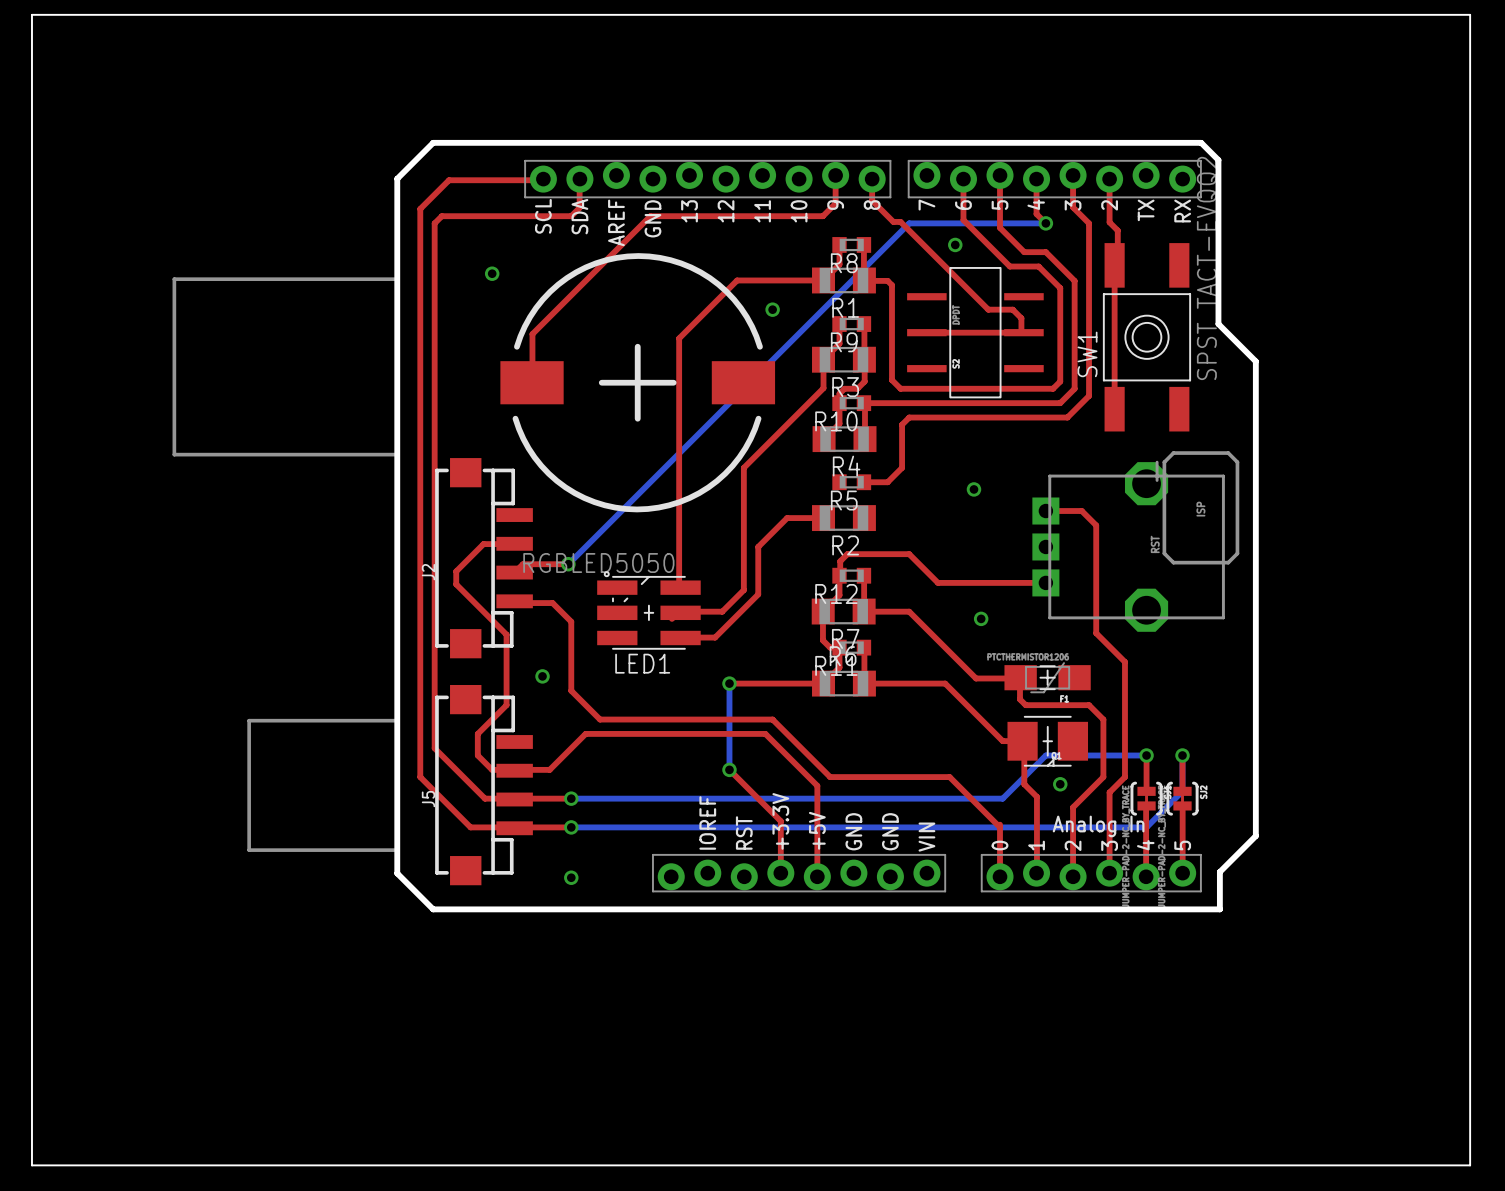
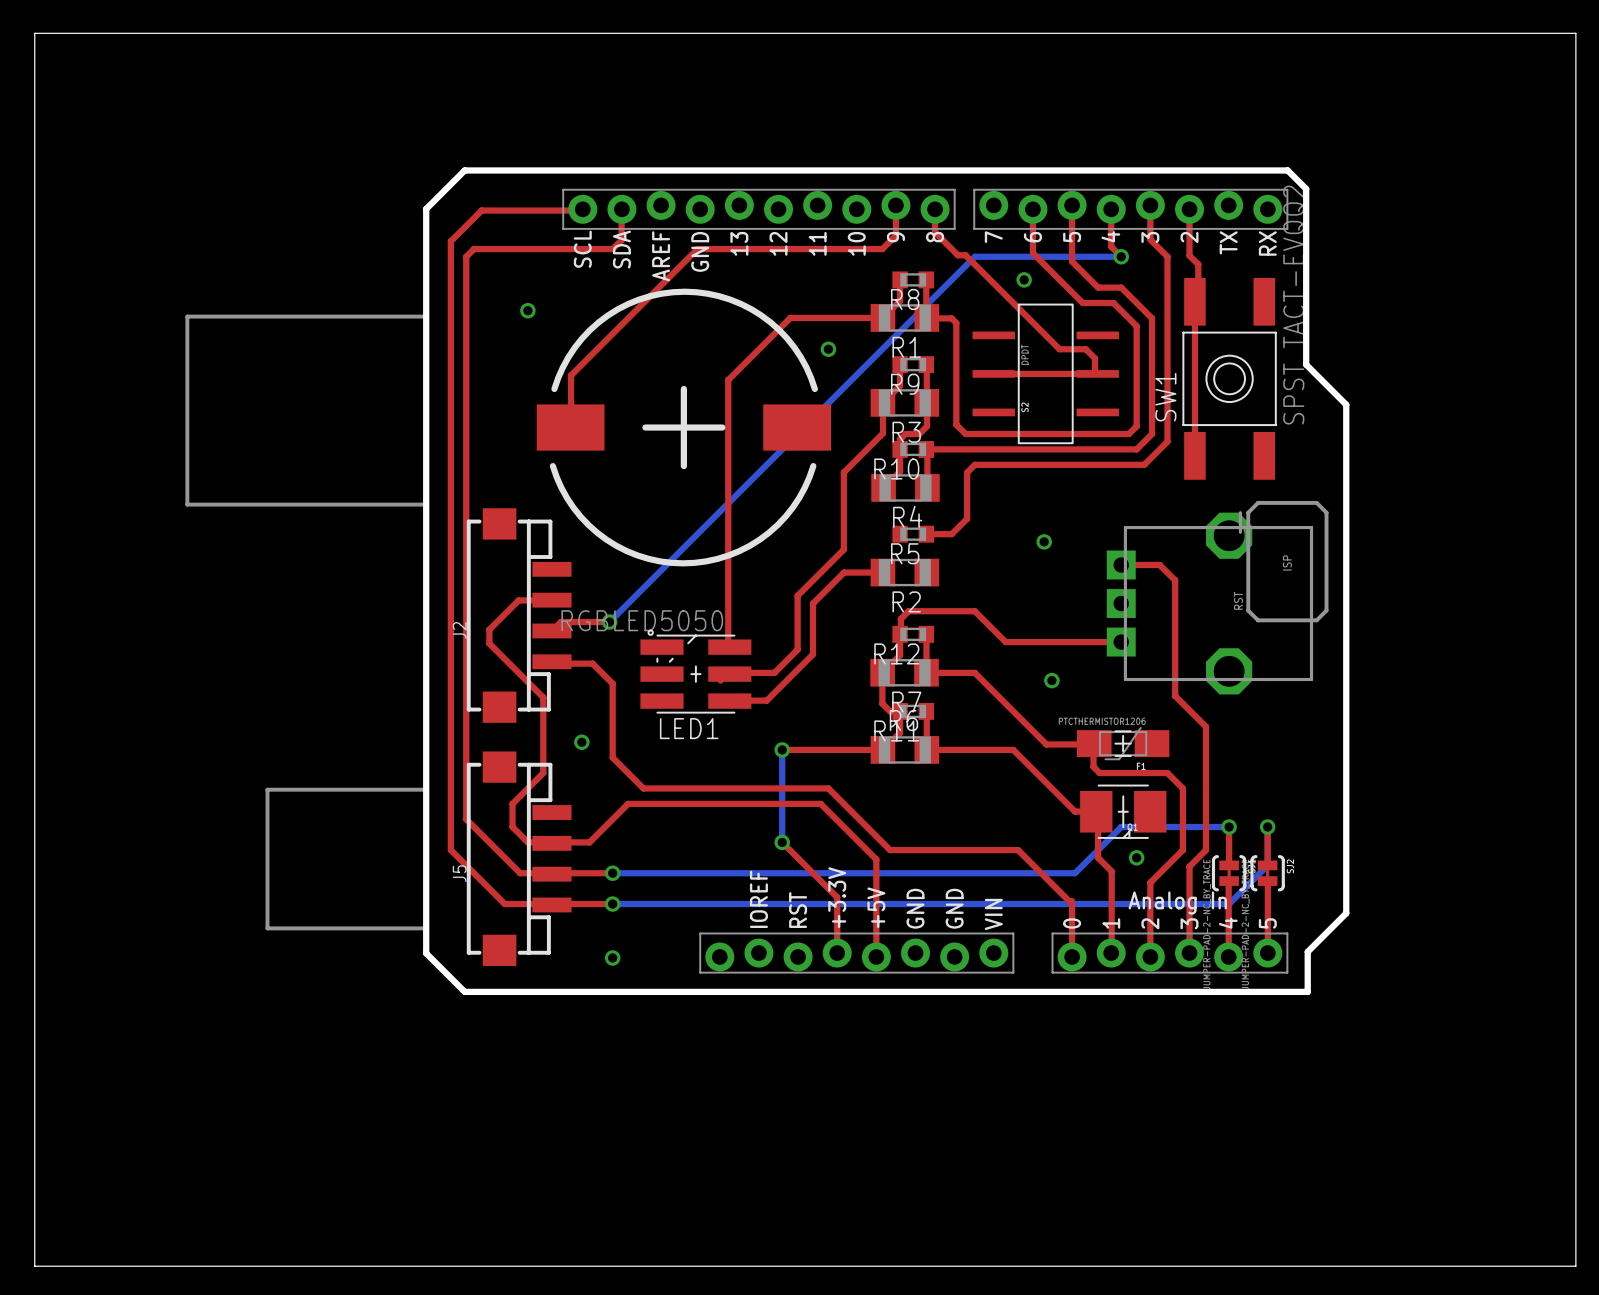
top track: (787, 424) (743, 467) (743, 539) -> (843, 472) (843, 549) (797, 595)

